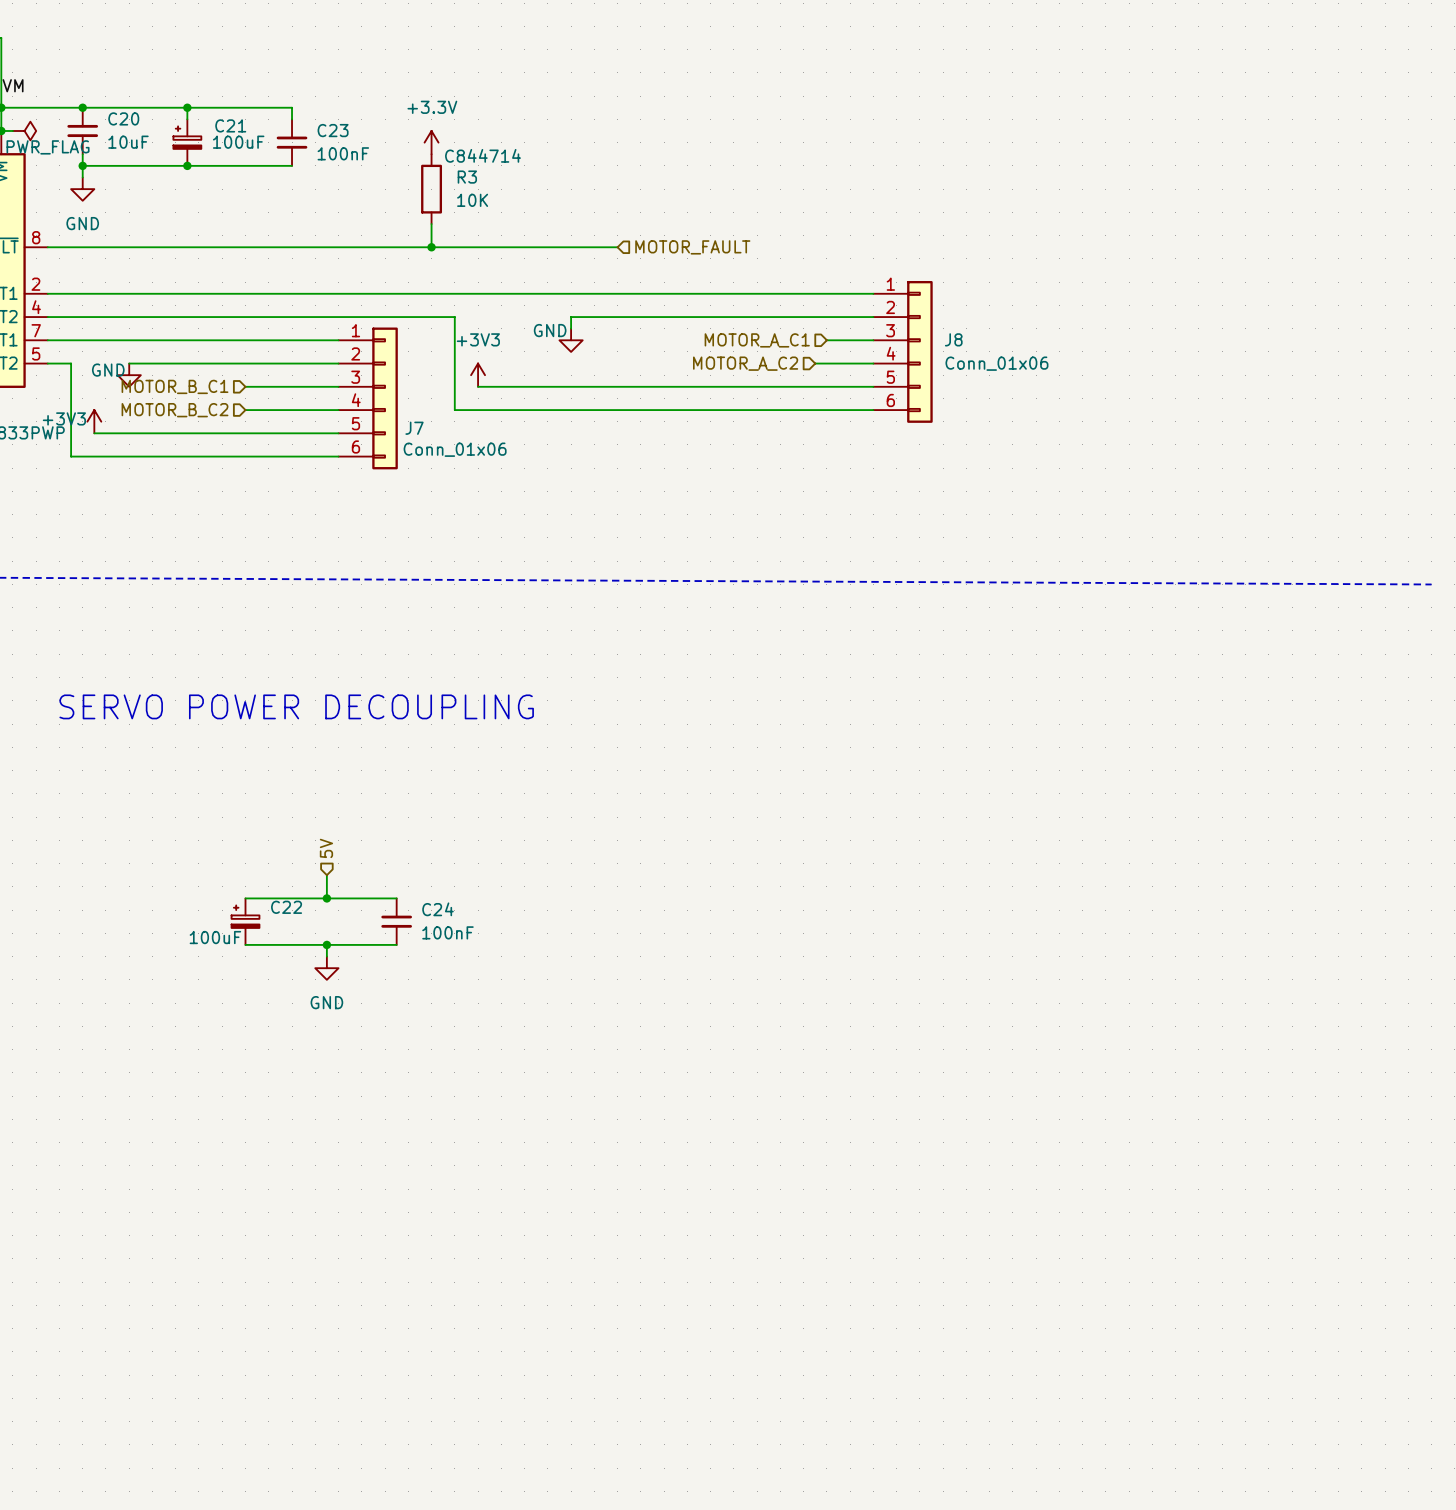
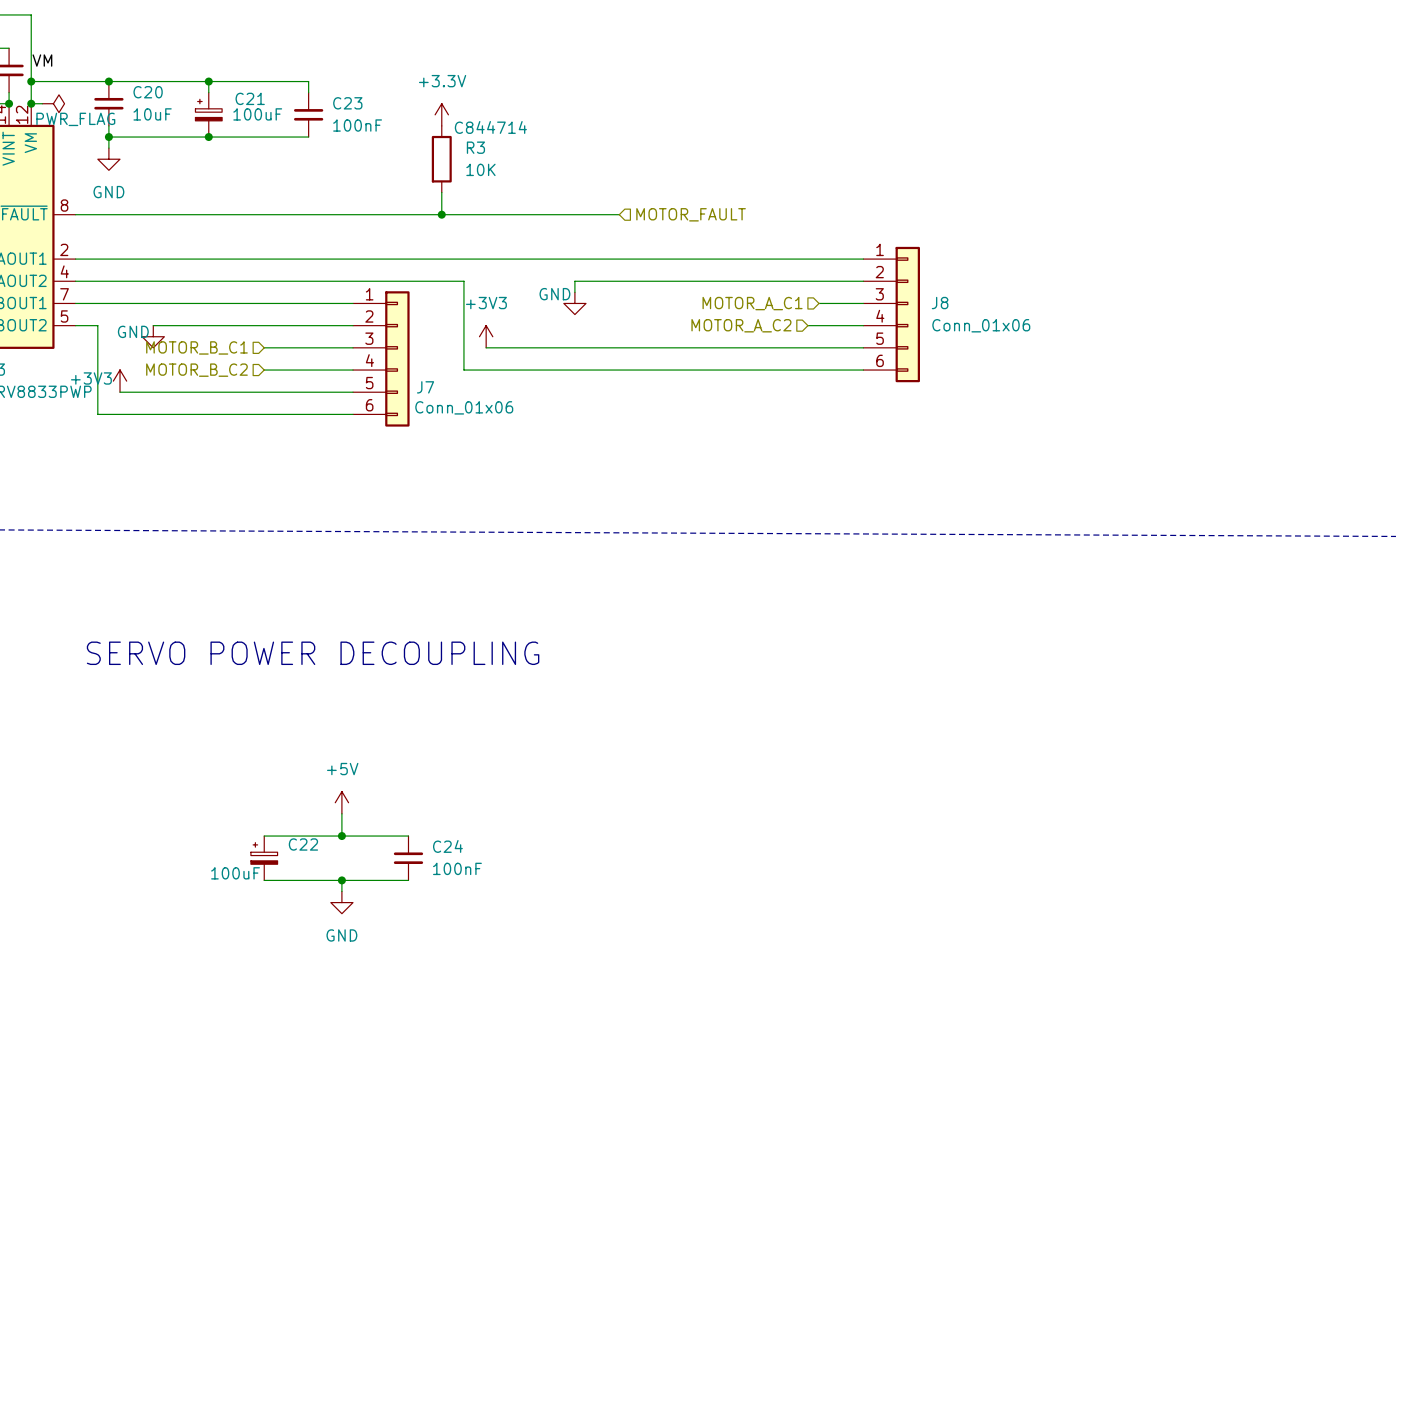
hierarchical label: 5V (326, 848) -> none
power symbol: none -> +5V (341, 802)

